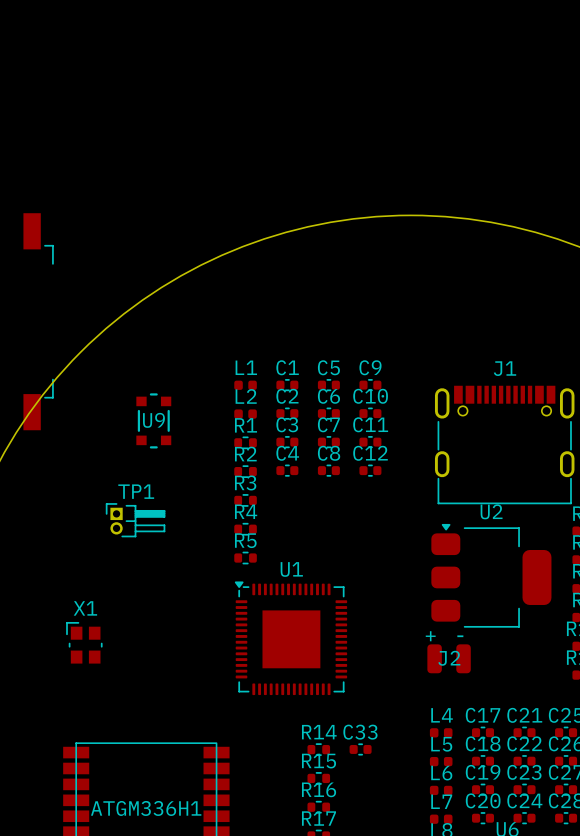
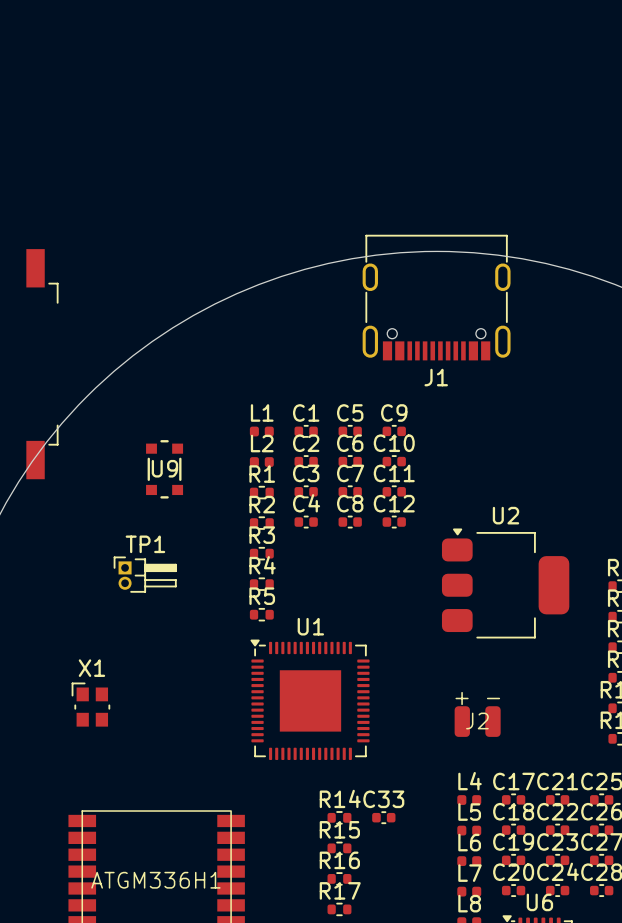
J1 rotation: 0° (504, 445) -> 180° (436, 297)
J1 position: (504, 445) -> (436, 297)
U2 position: (491, 575) -> (505, 583)

